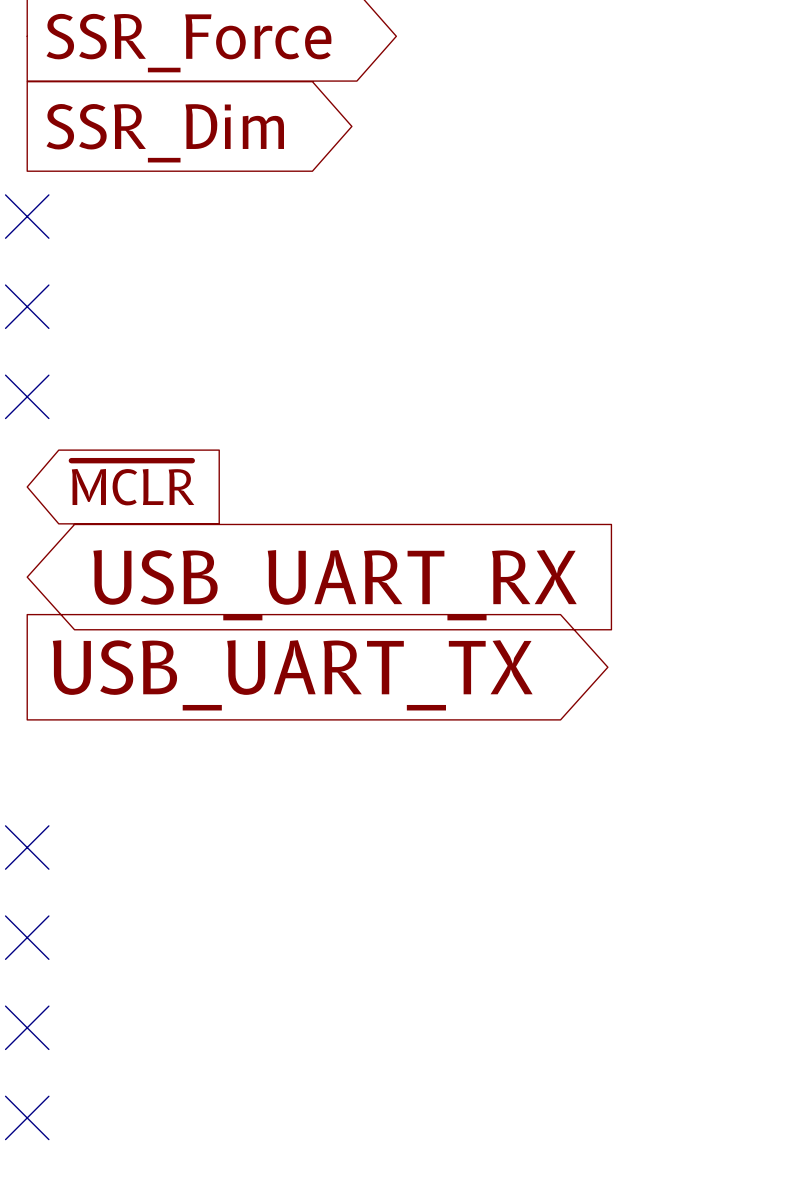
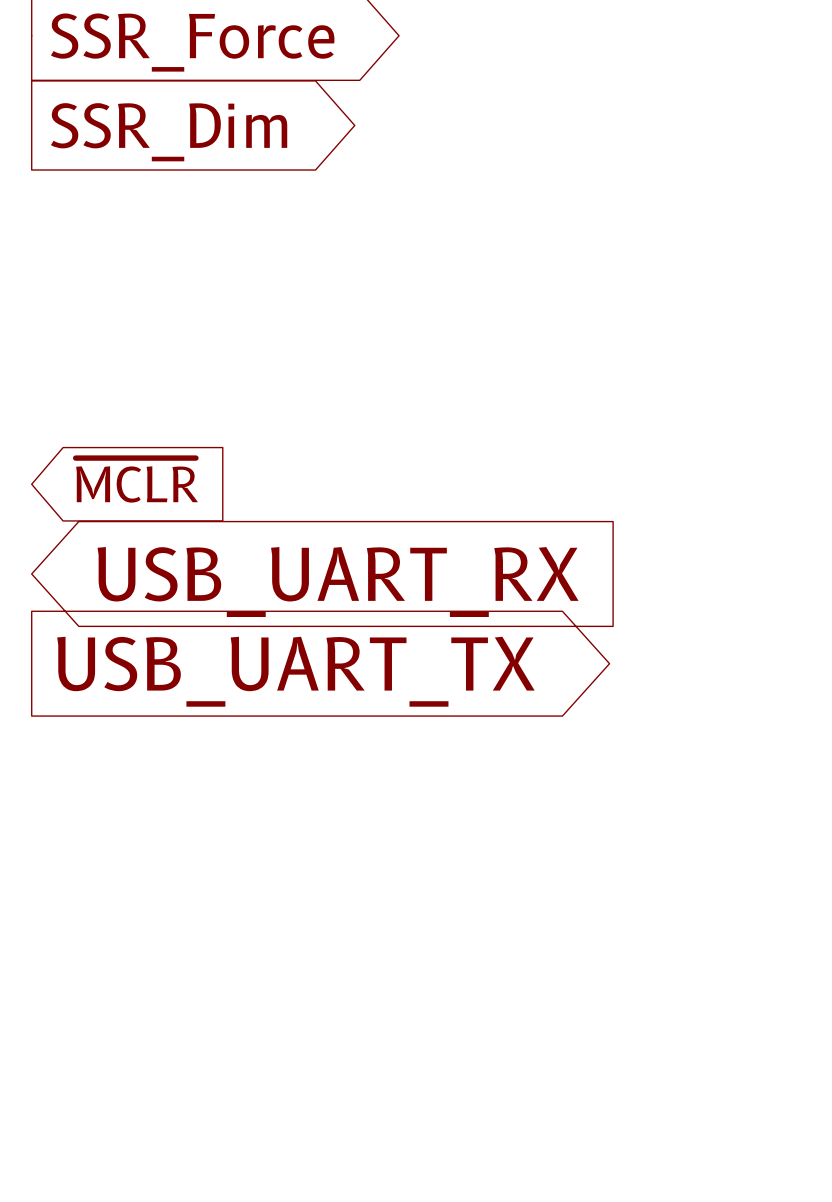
no-connect mark: (27, 216) -> none
no-connect mark: (27, 306) -> none
no-connect mark: (27, 396) -> none
no-connect mark: (27, 847) -> none
no-connect mark: (27, 937) -> none
no-connect mark: (27, 1027) -> none
no-connect mark: (27, 1117) -> none

